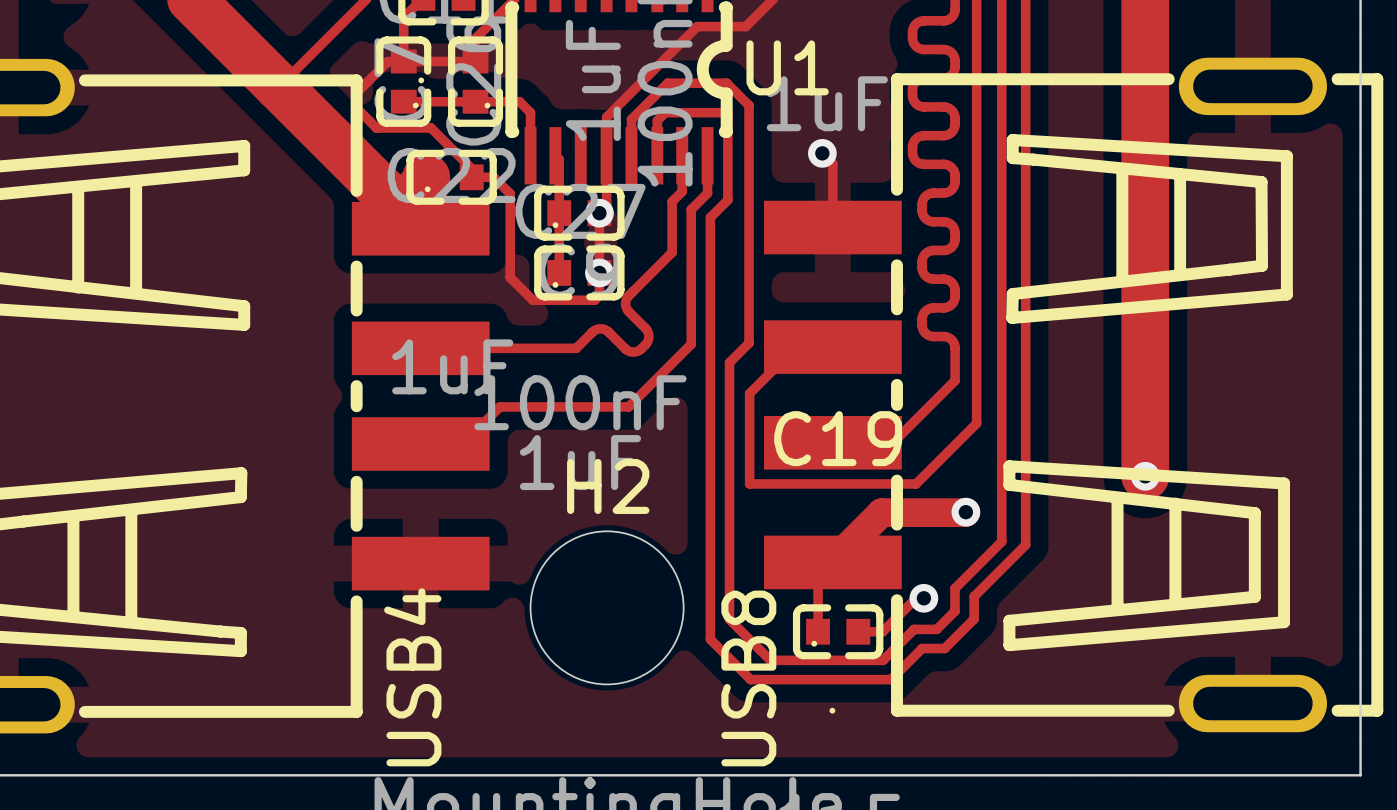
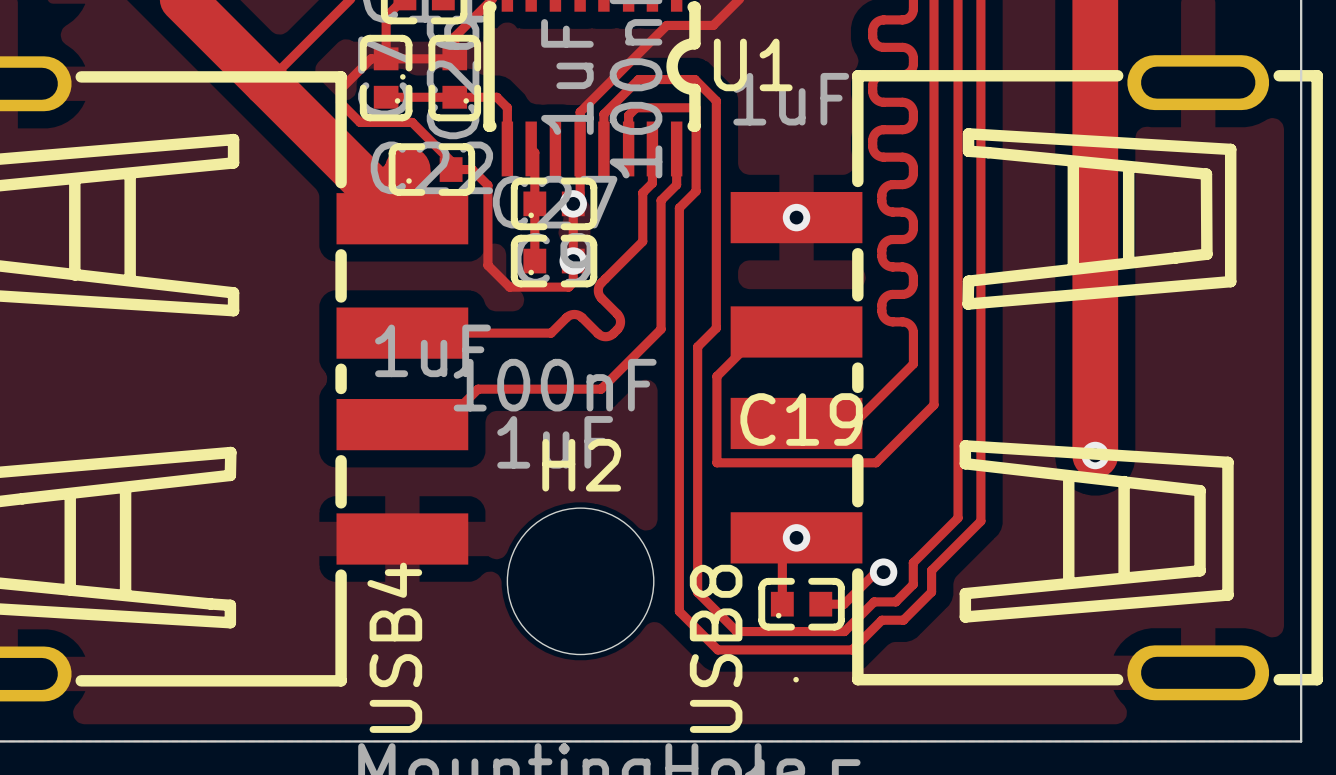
track: (822, 153) (832, 163) (832, 227) -> none
via position: (822, 153) -> (796, 217)
track: (965, 512) (881, 512) (832, 561) -> none
via position: (965, 512) -> (796, 537)

